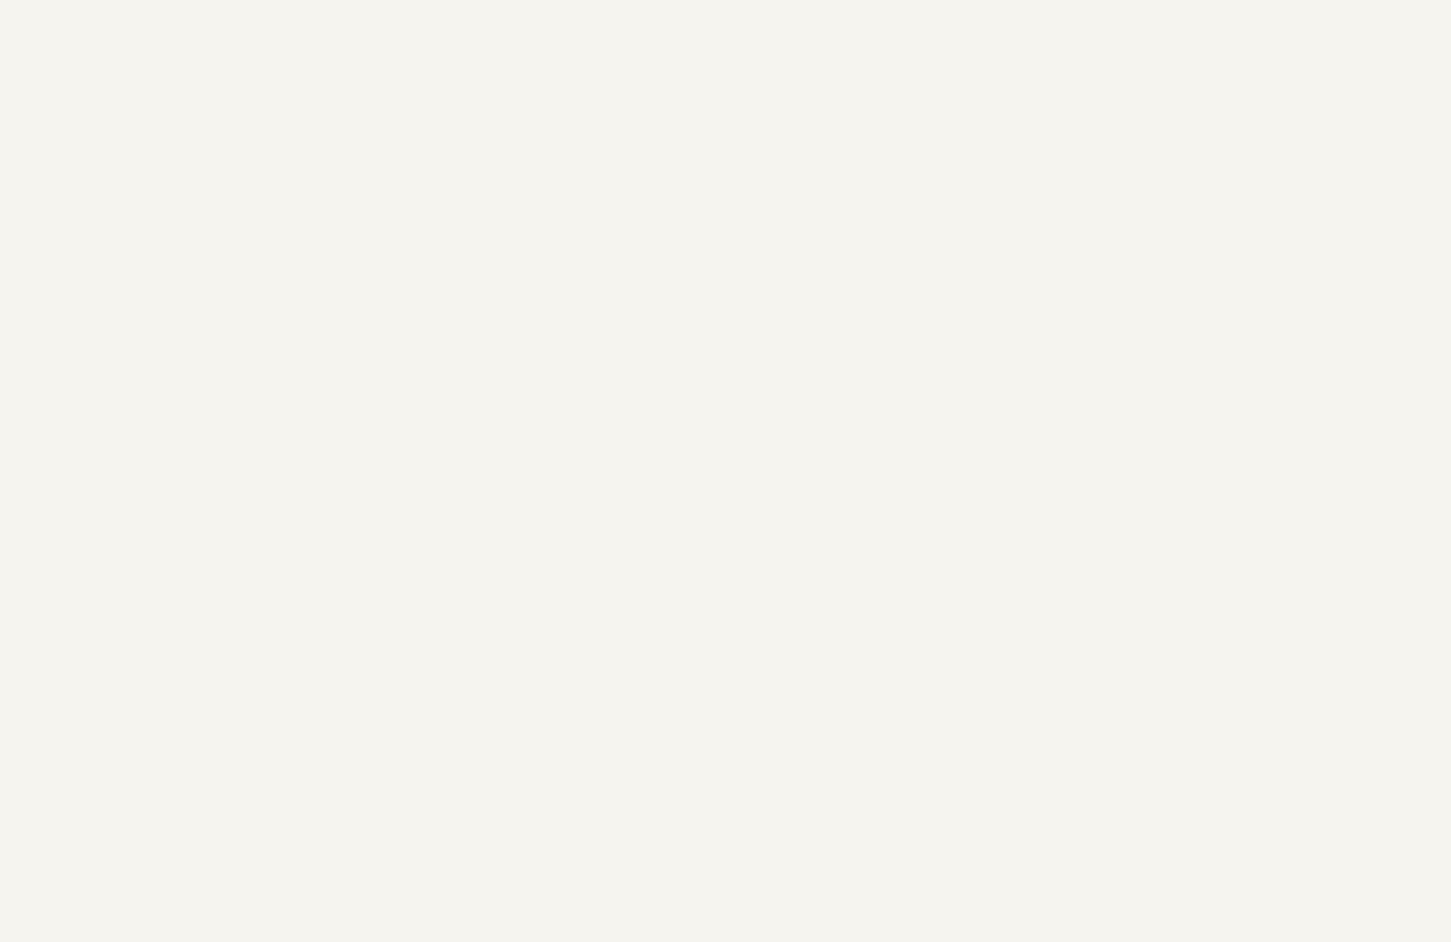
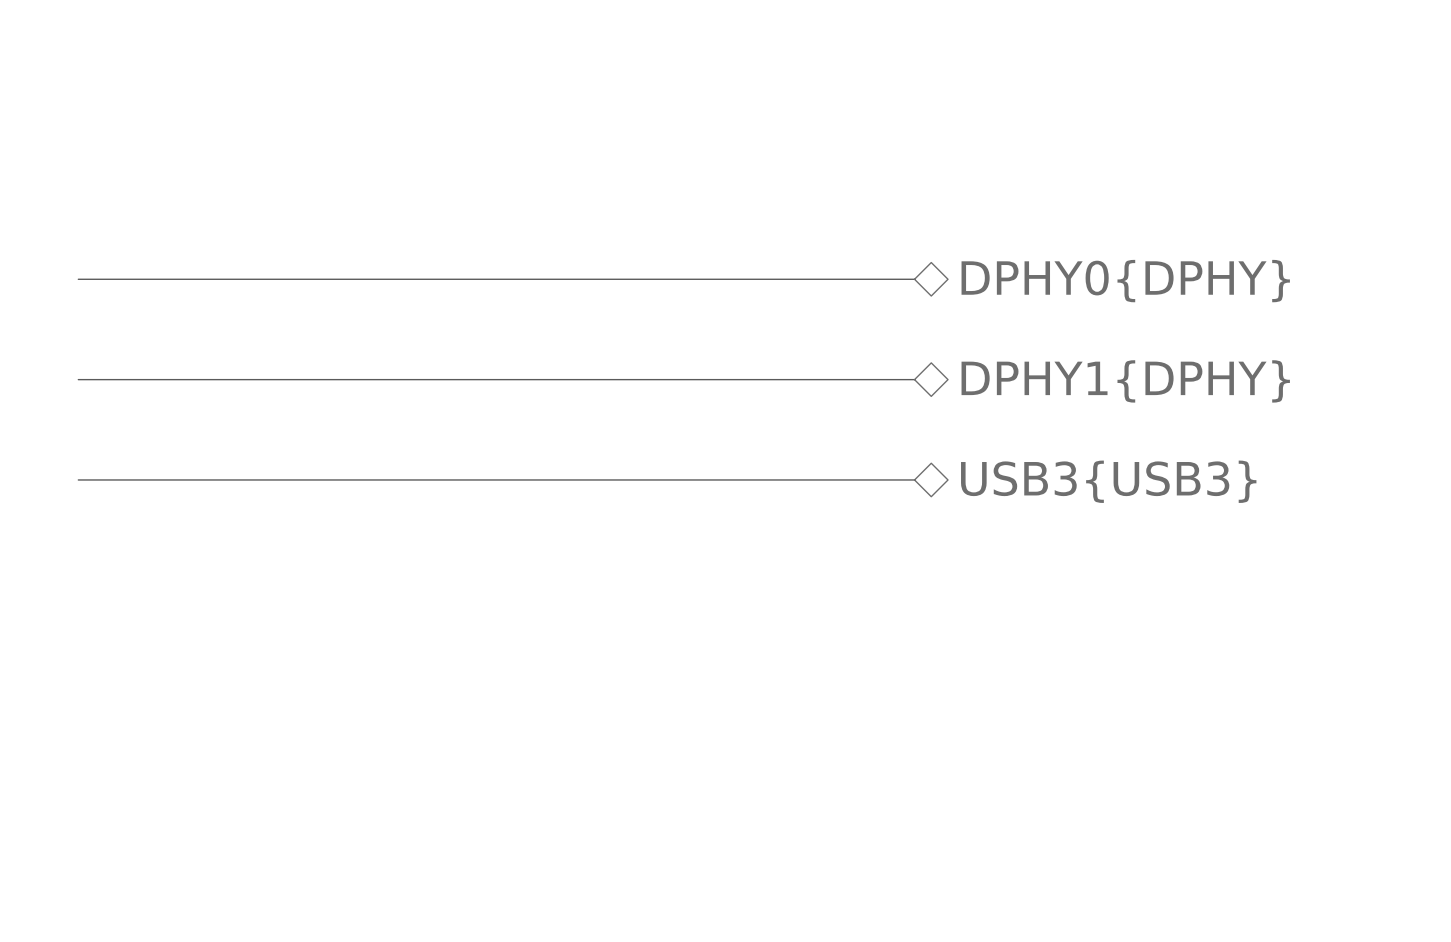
bus: none -> (78, 279) (914, 279)
hierarchical label: none -> DPHY0{DPHY} (1125, 281)
bus: none -> (78, 379) (914, 379)
hierarchical label: none -> DPHY1{DPHY} (1125, 381)
bus: none -> (78, 479) (914, 479)
hierarchical label: none -> USB3{USB3} (1108, 481)

